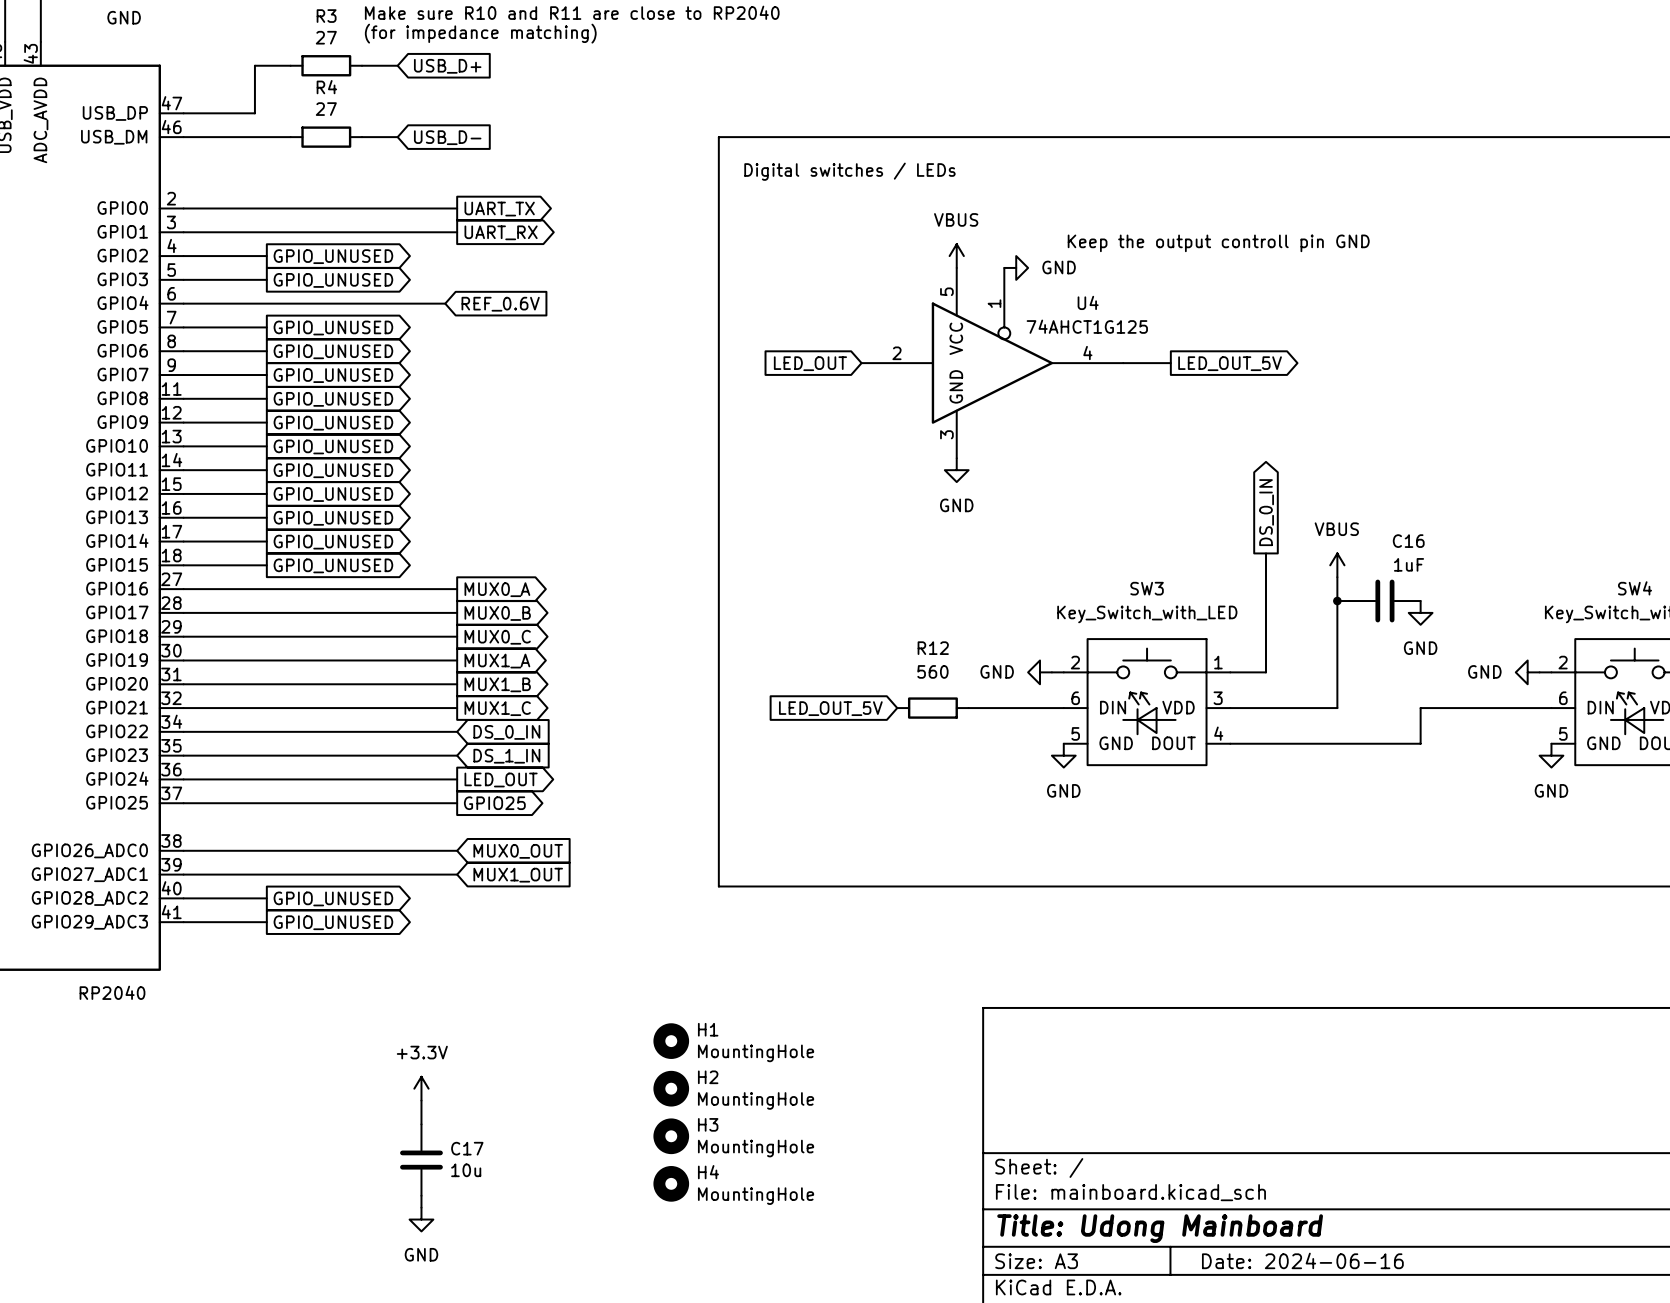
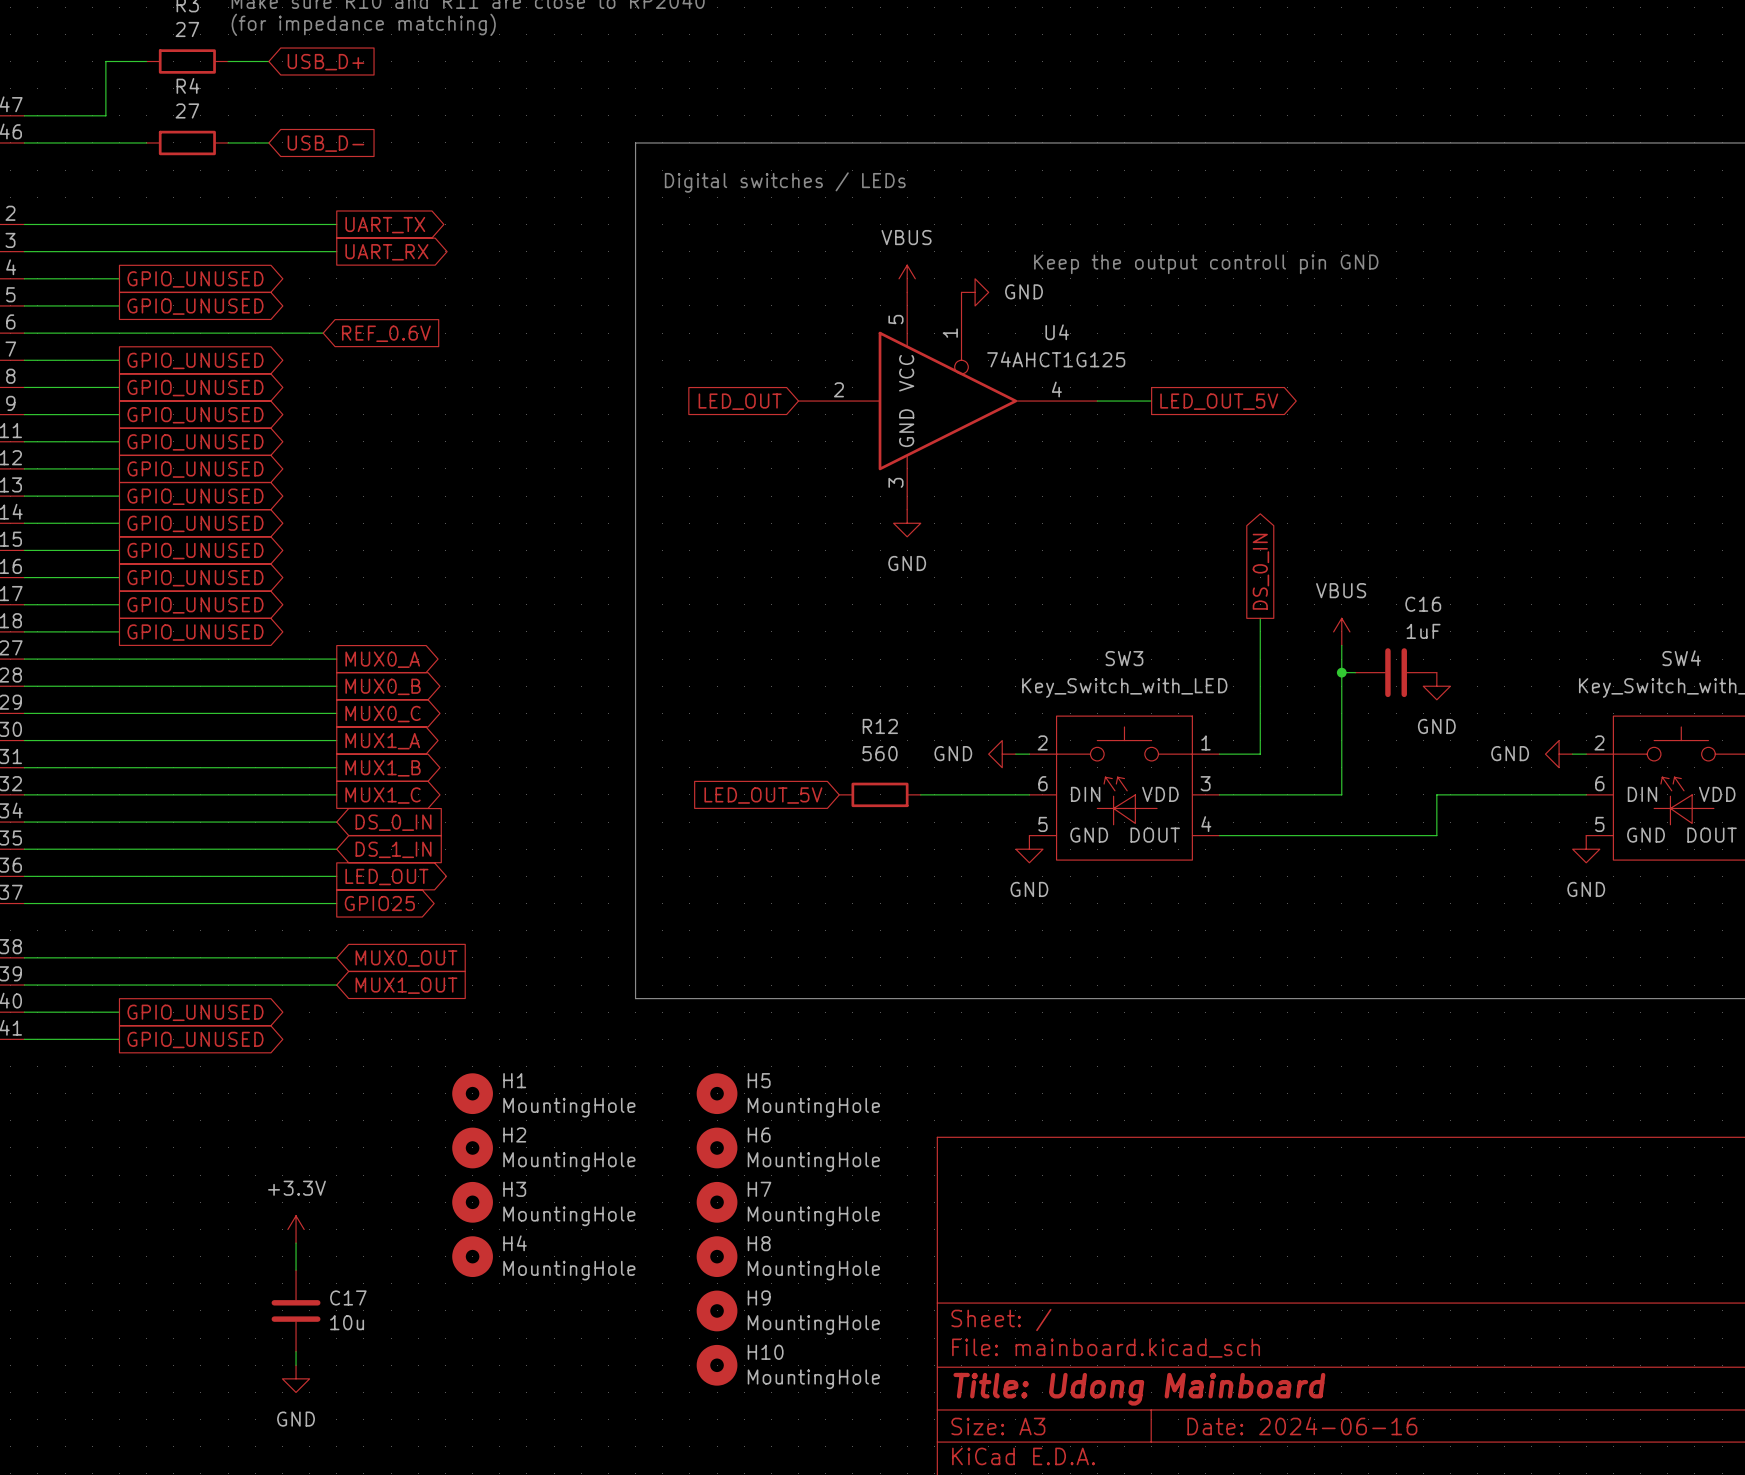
H5: none -> MountingHole (717, 1093)
H6: none -> MountingHole (717, 1147)
H1 position: (671, 1041) -> (472, 1093)
H7: none -> MountingHole (717, 1202)
H2 position: (671, 1088) -> (472, 1147)
H8: none -> MountingHole (717, 1256)
H3 position: (671, 1136) -> (472, 1202)
H9: none -> MountingHole (717, 1310)
H4 position: (671, 1183) -> (472, 1256)
H10: none -> MountingHole (717, 1365)

